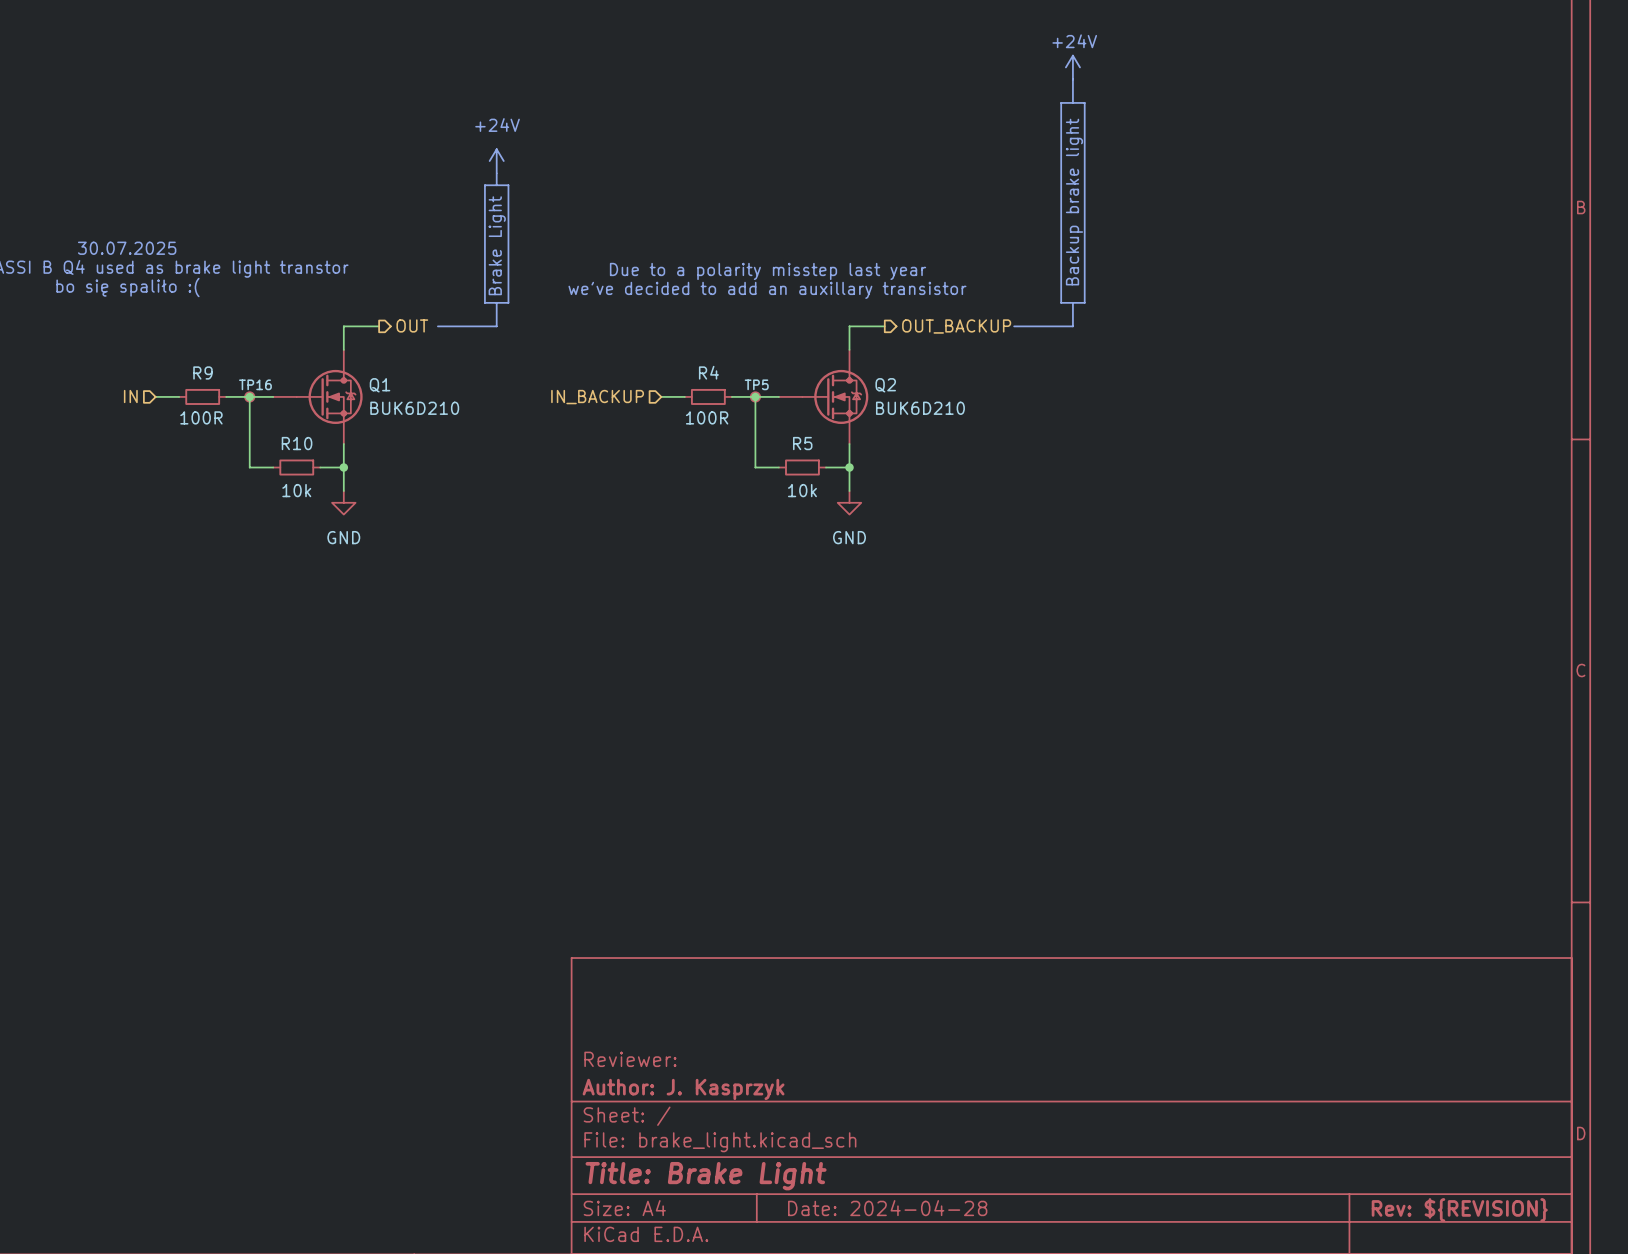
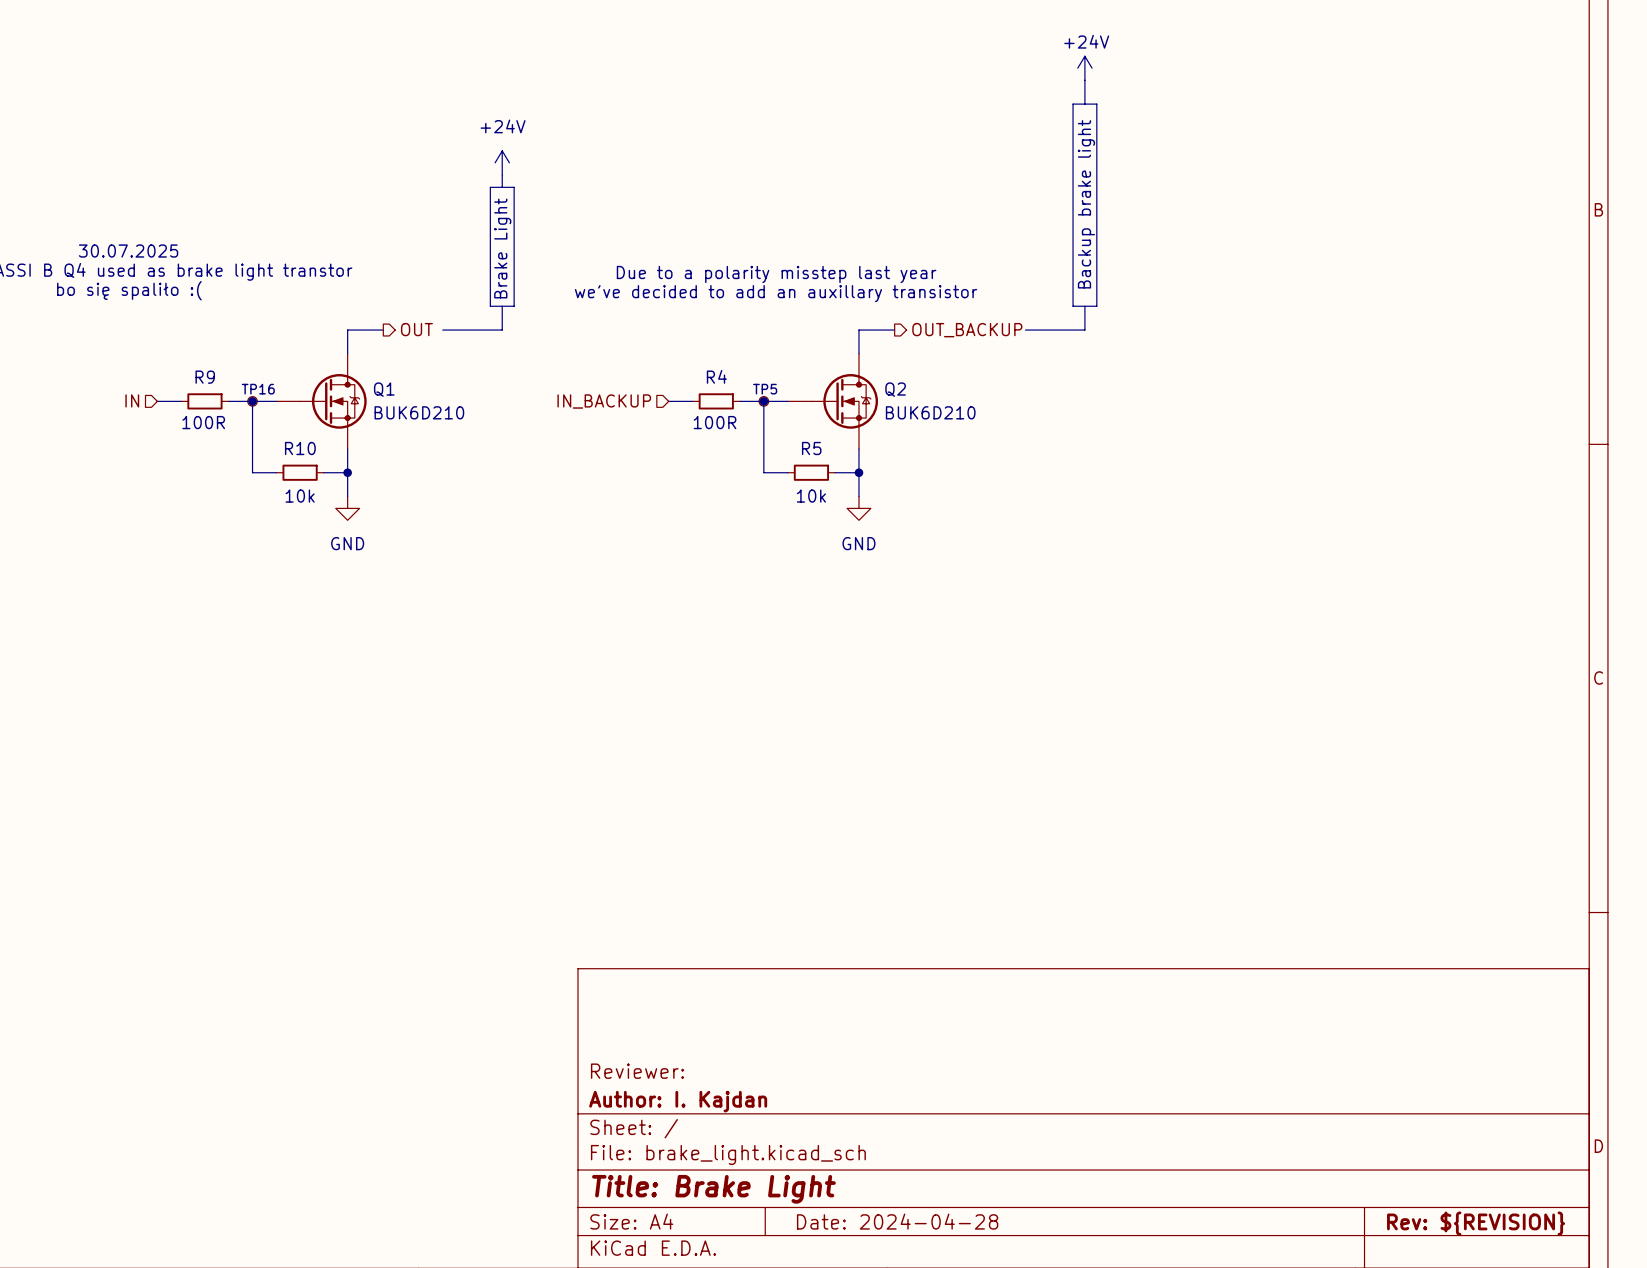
title block: Author: J. Kasprzyk (683, 1089) -> Author: I. Kajdan (678, 1101)

